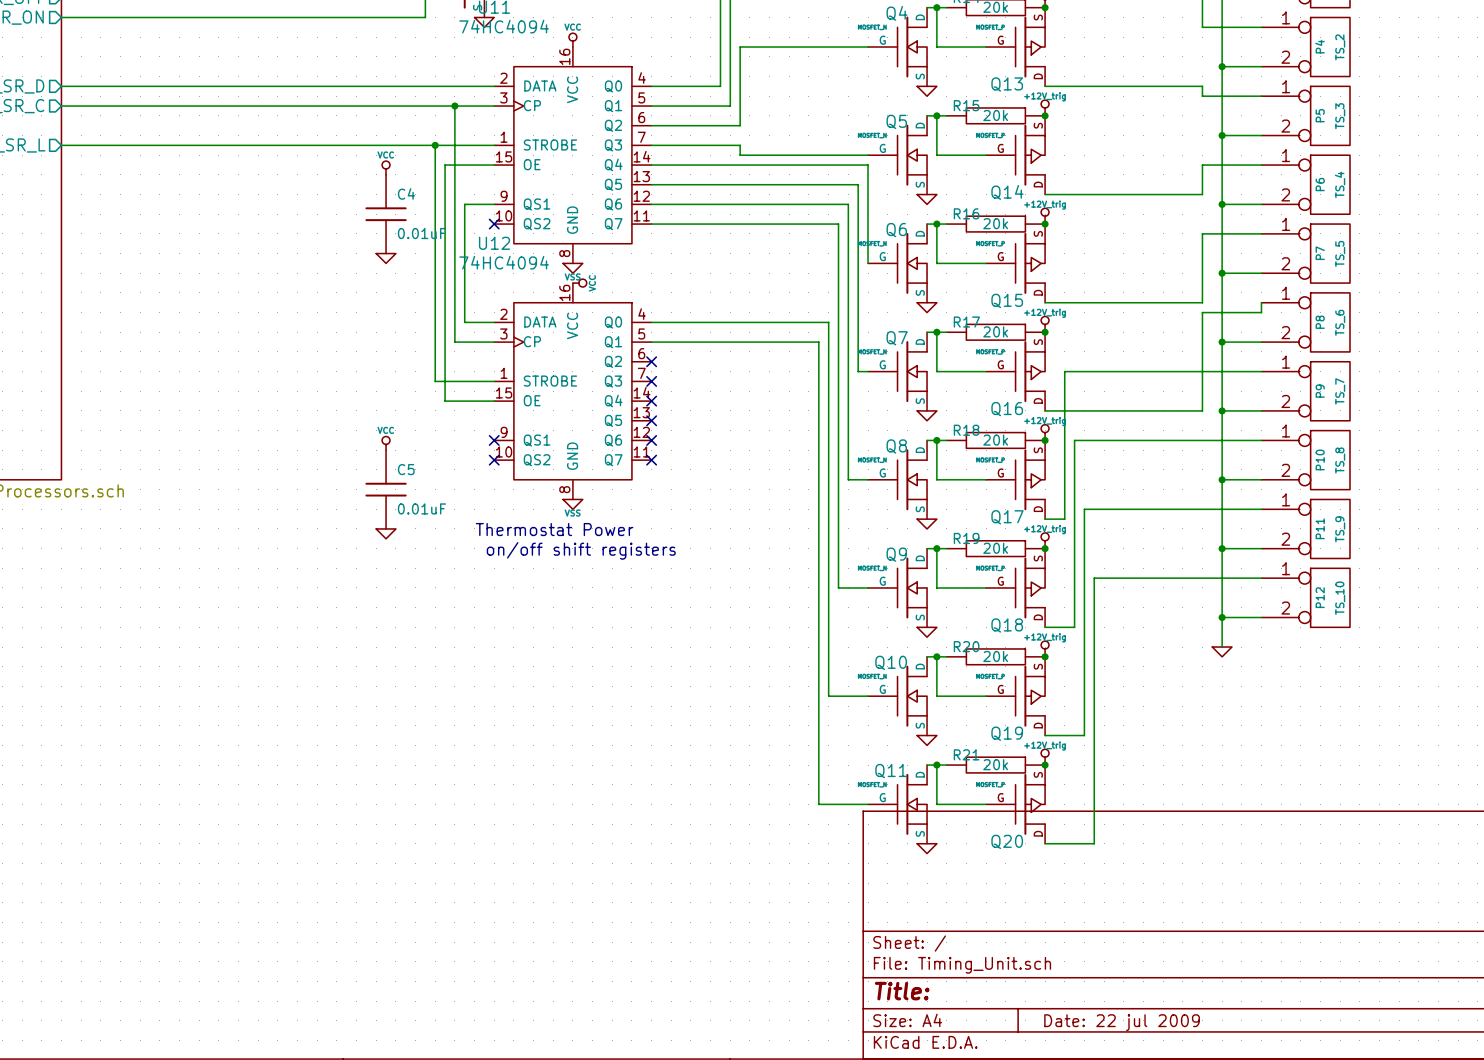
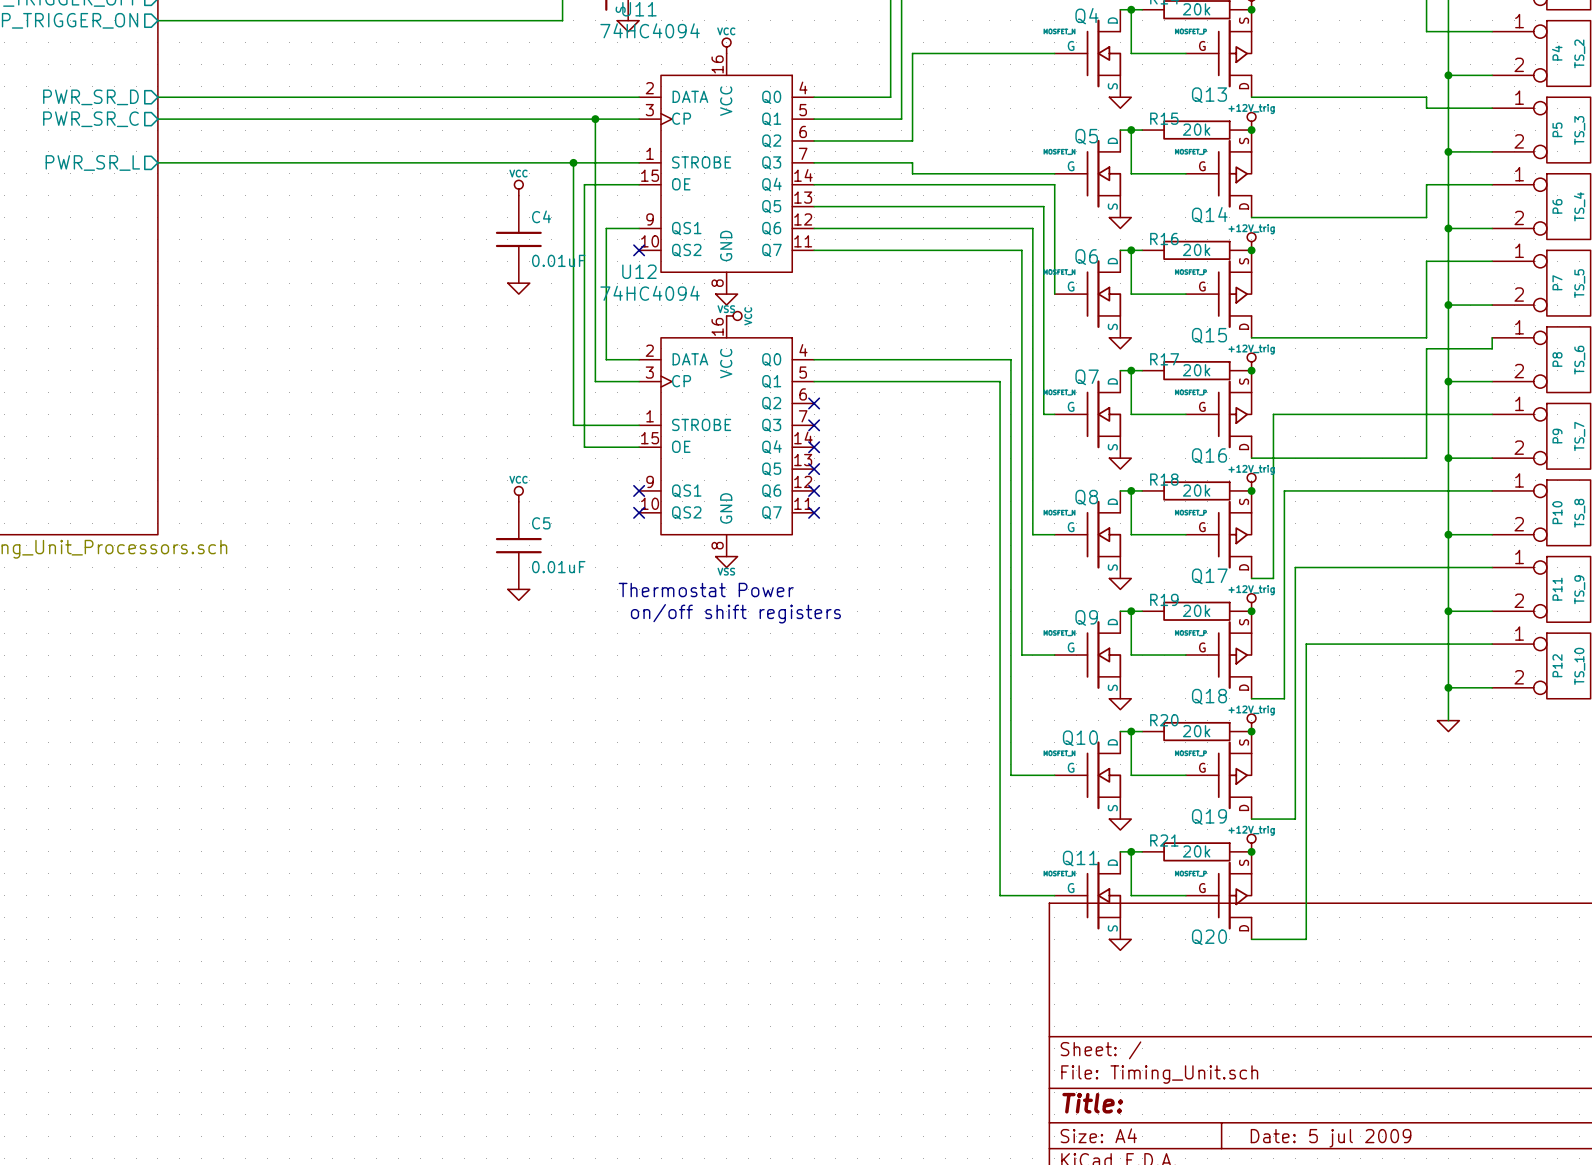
title block: Date: 22 jul 2009 (1122, 1022) -> Date: 5 jul 2009 (1331, 1138)

